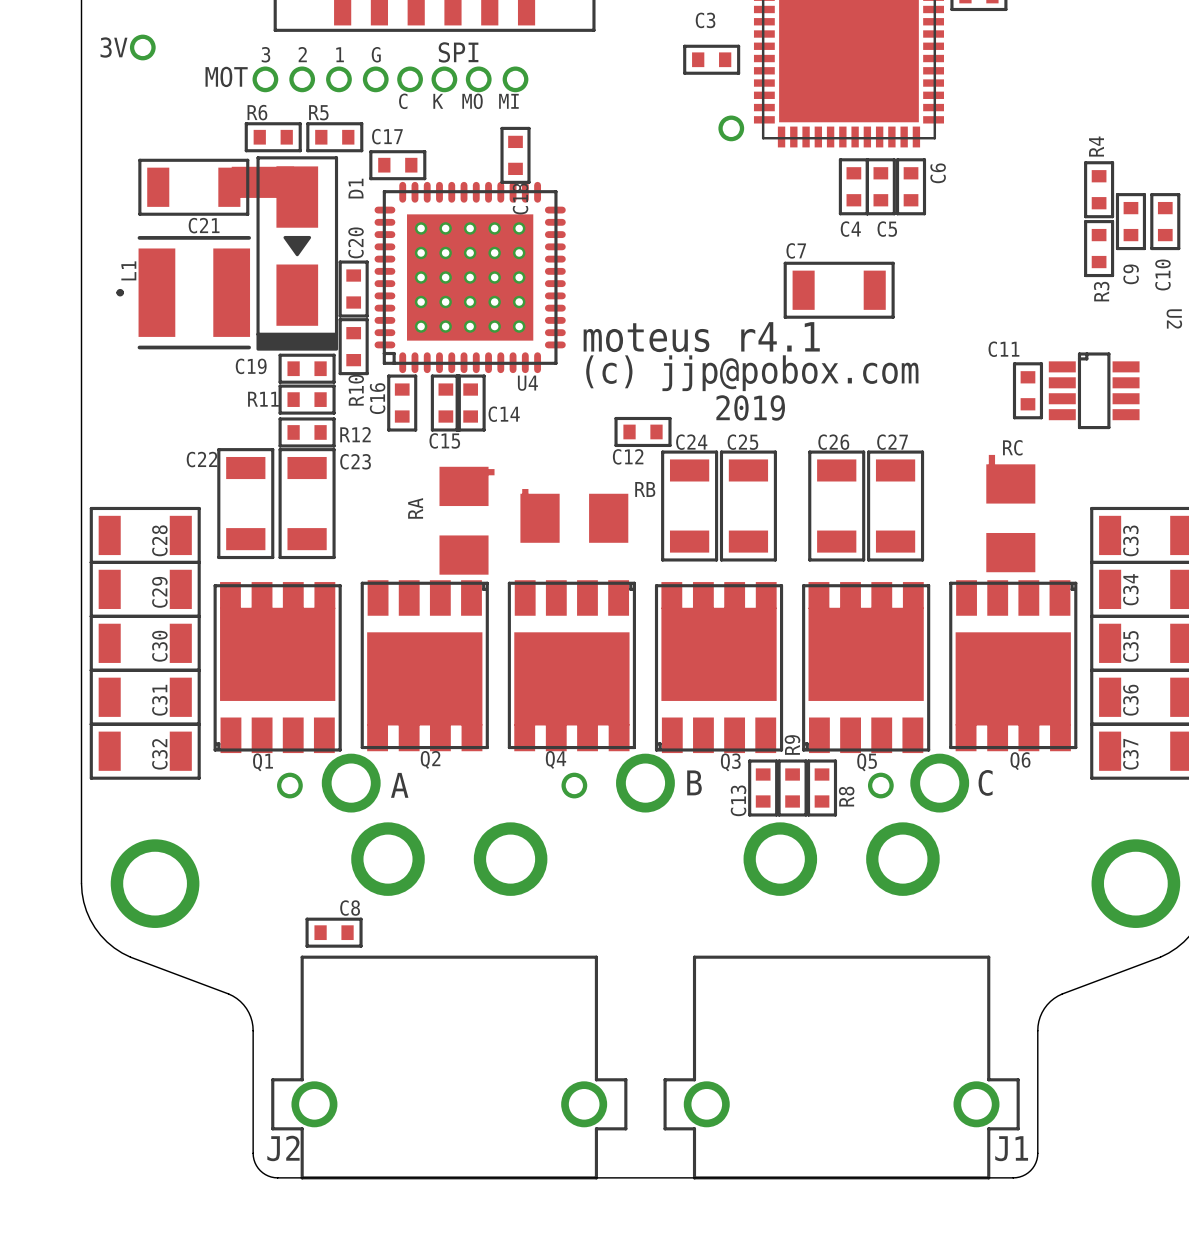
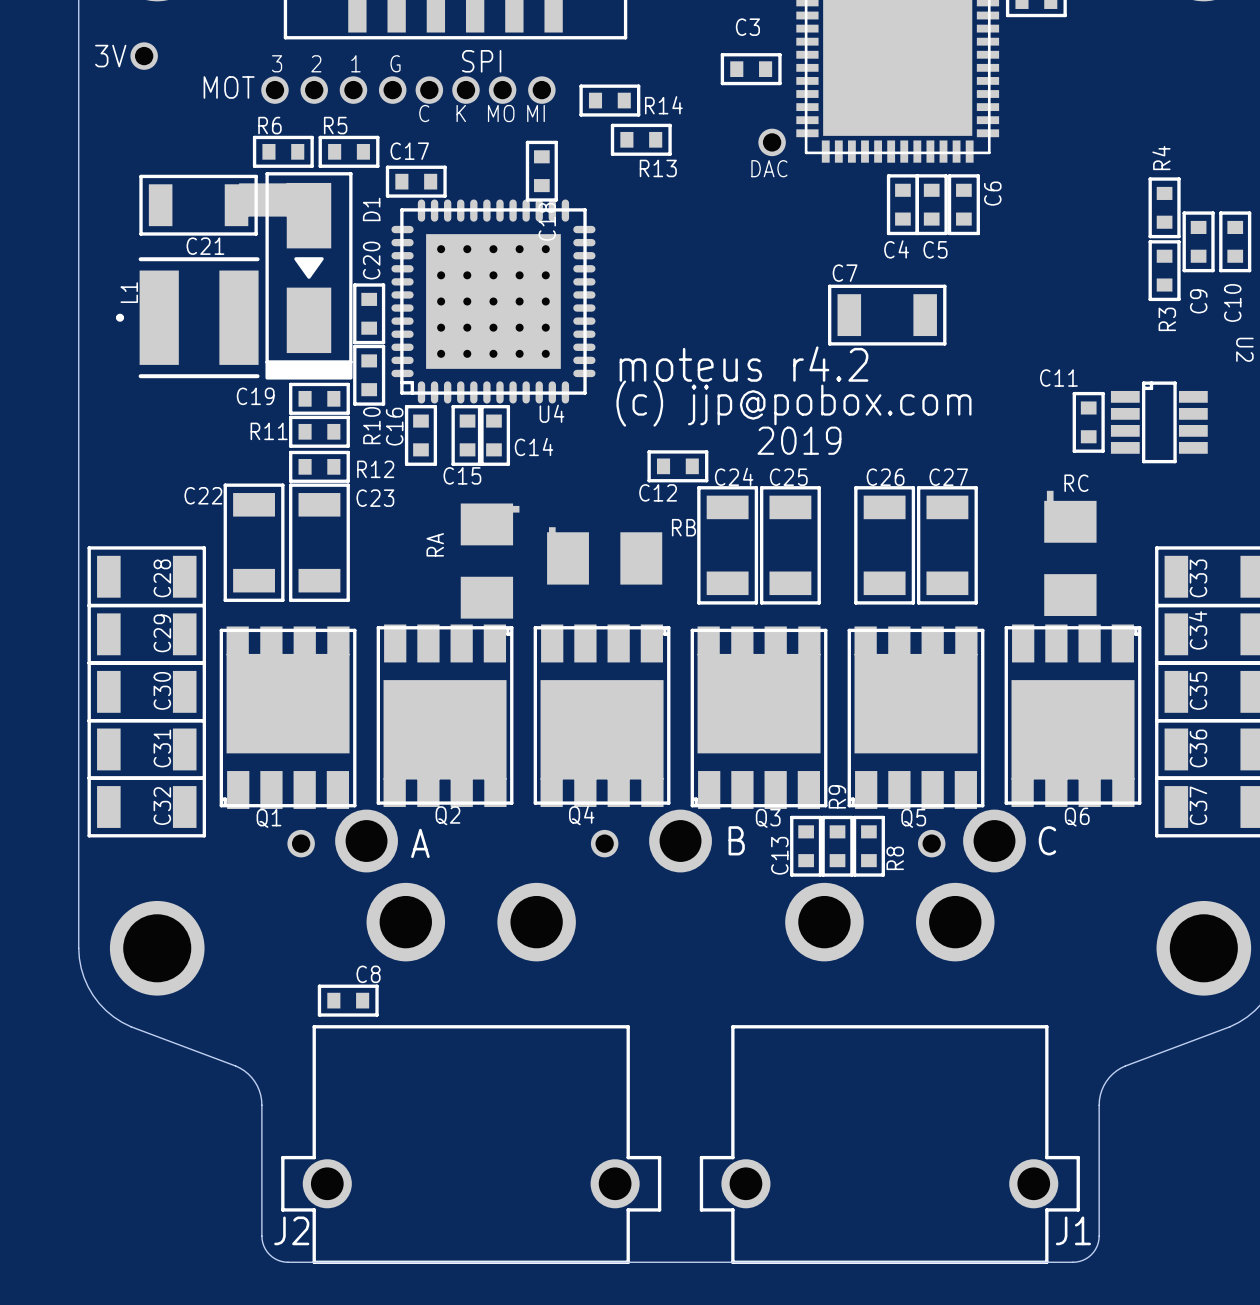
R14: none -> (609, 100)
R13: none -> (641, 139)
text: none -> DAC (769, 168)
text: moteus r4.1 (701, 337) -> moteus r4.2 (744, 364)

